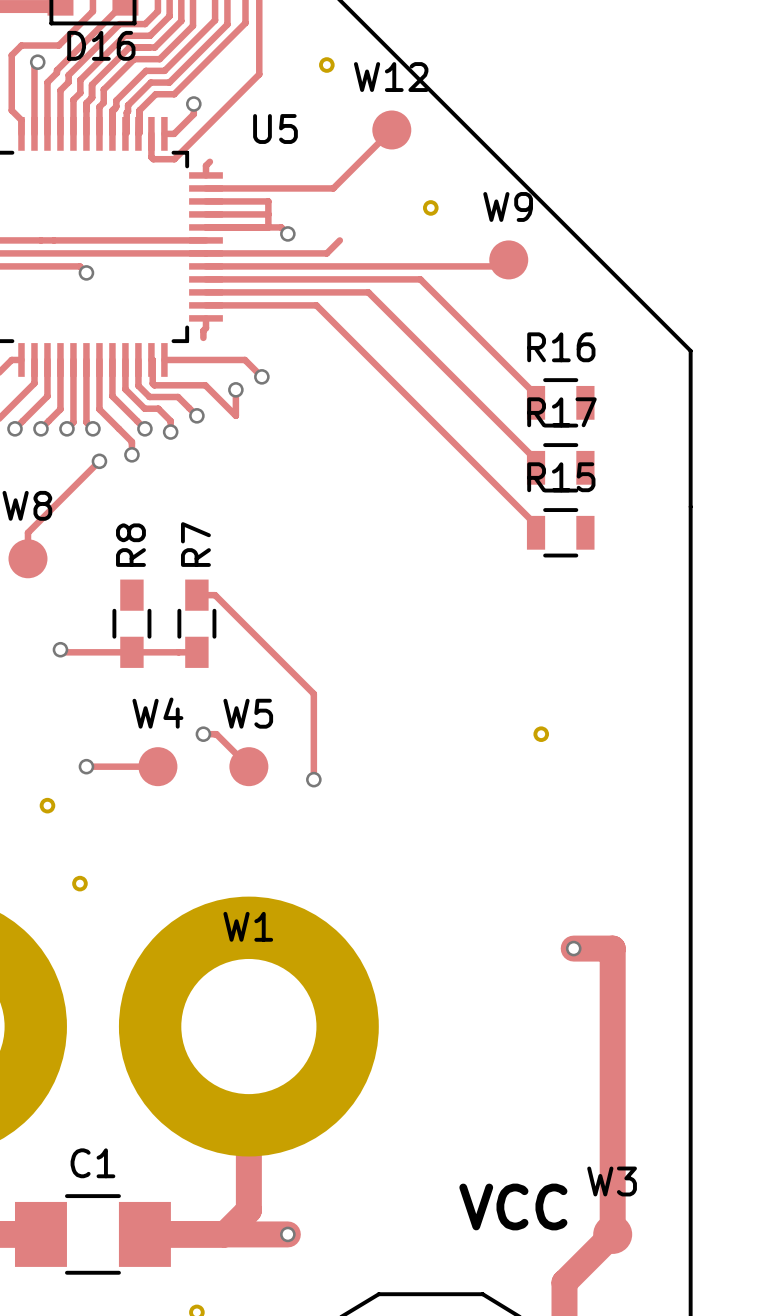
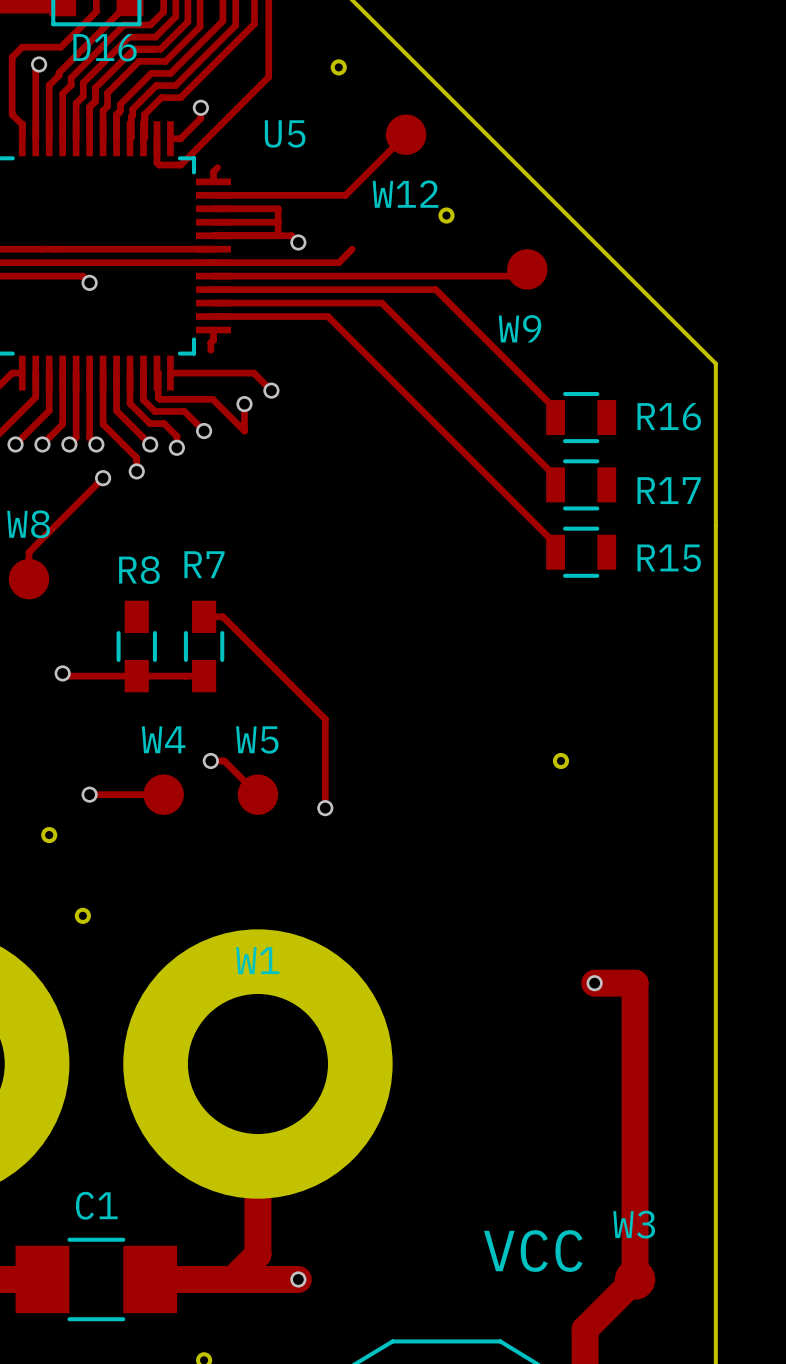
W12 name position: W12 (391, 77) -> W12 (405, 194)
W9 name position: W9 (508, 206) -> W9 (520, 328)
R16 name position: R16 (561, 347) -> R16 (669, 416)
R17 name position: R17 (561, 412) -> R17 (669, 490)
R15 name position: R15 (561, 477) -> R15 (669, 558)
R7 name rotation: 0° (195, 544) -> 90° clockwise (204, 564)
R8 name rotation: 0° (130, 545) -> 90° clockwise (139, 570)

